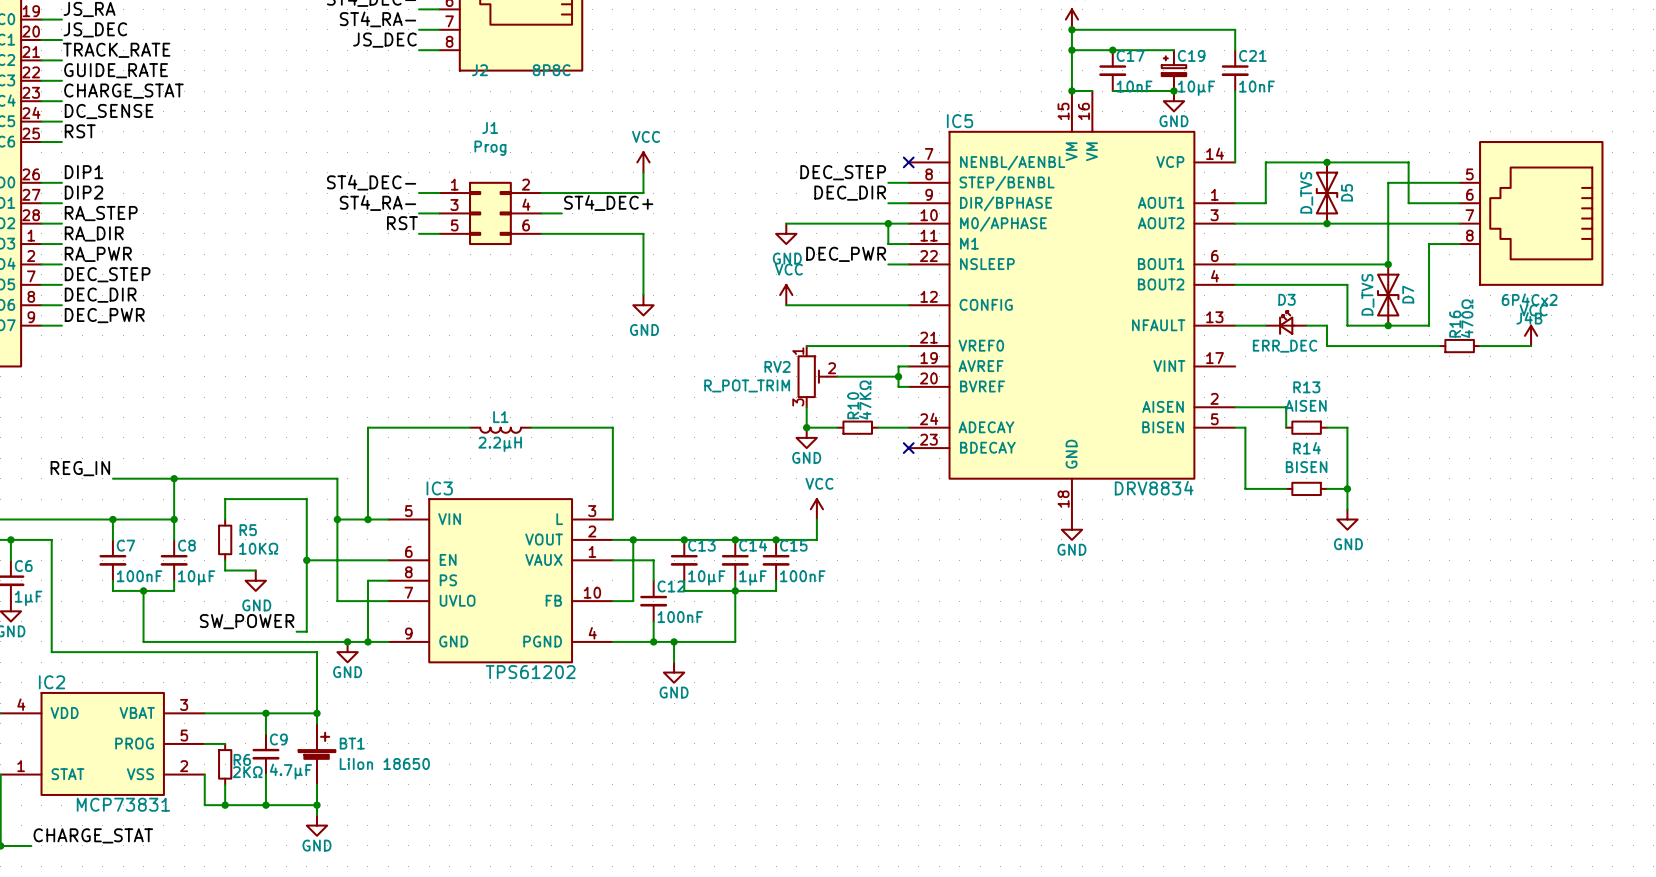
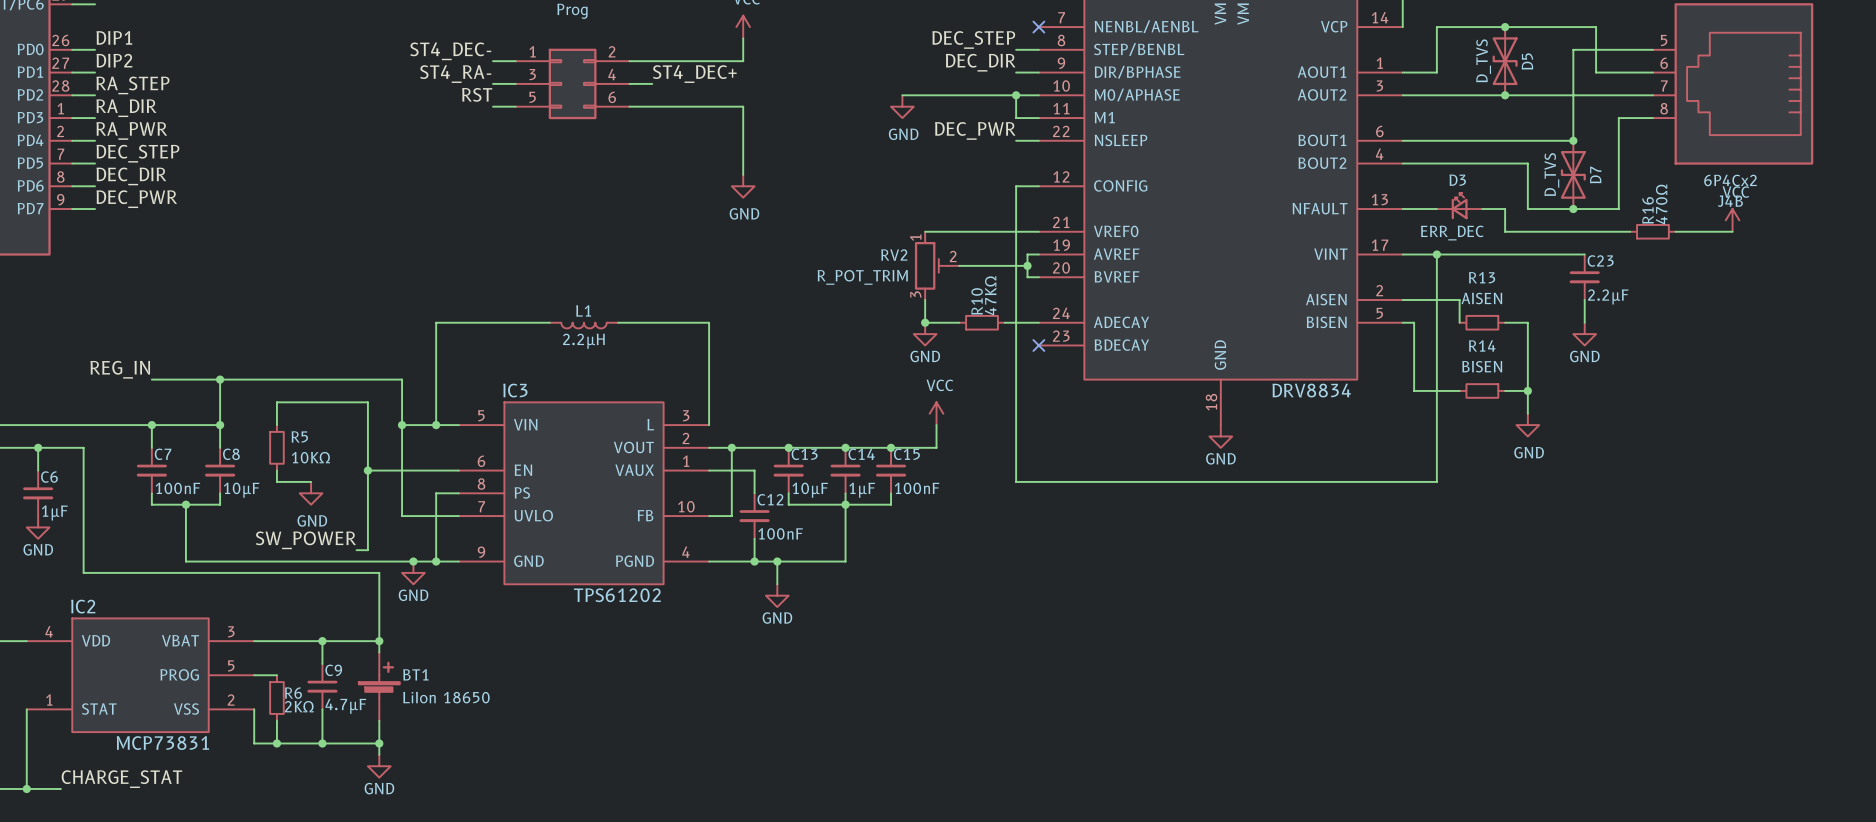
power symbol: VCC (786, 295) -> none
wire: (786, 305) (888, 305) -> (1436, 254) (1436, 481) (1016, 481) (1016, 186)
wire: none -> (1402, 254) (1584, 254)
junction: none -> (1436, 254)
C23: none -> 2.2µF (1584, 277)
wire: none -> (1584, 299) (1584, 322)
power symbol: none -> GND (1584, 334)

